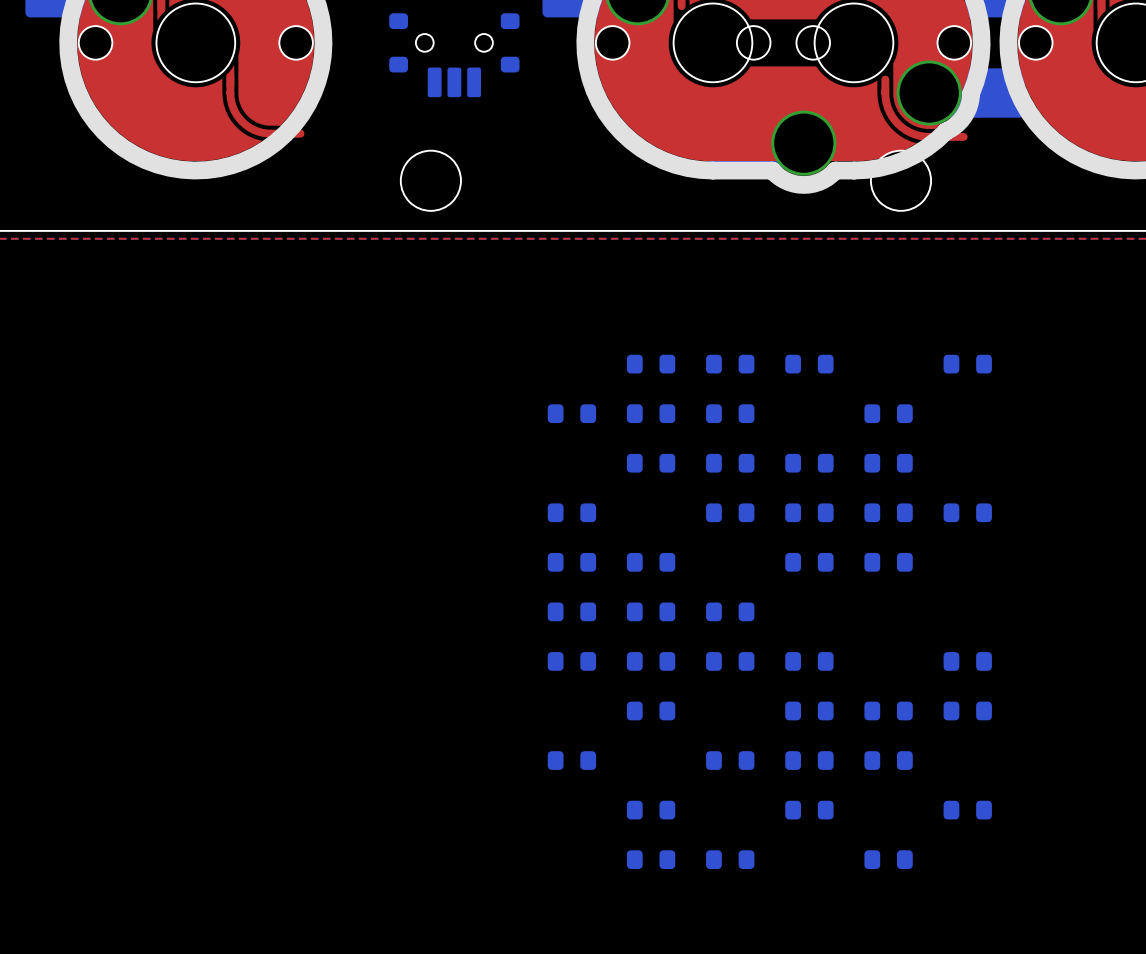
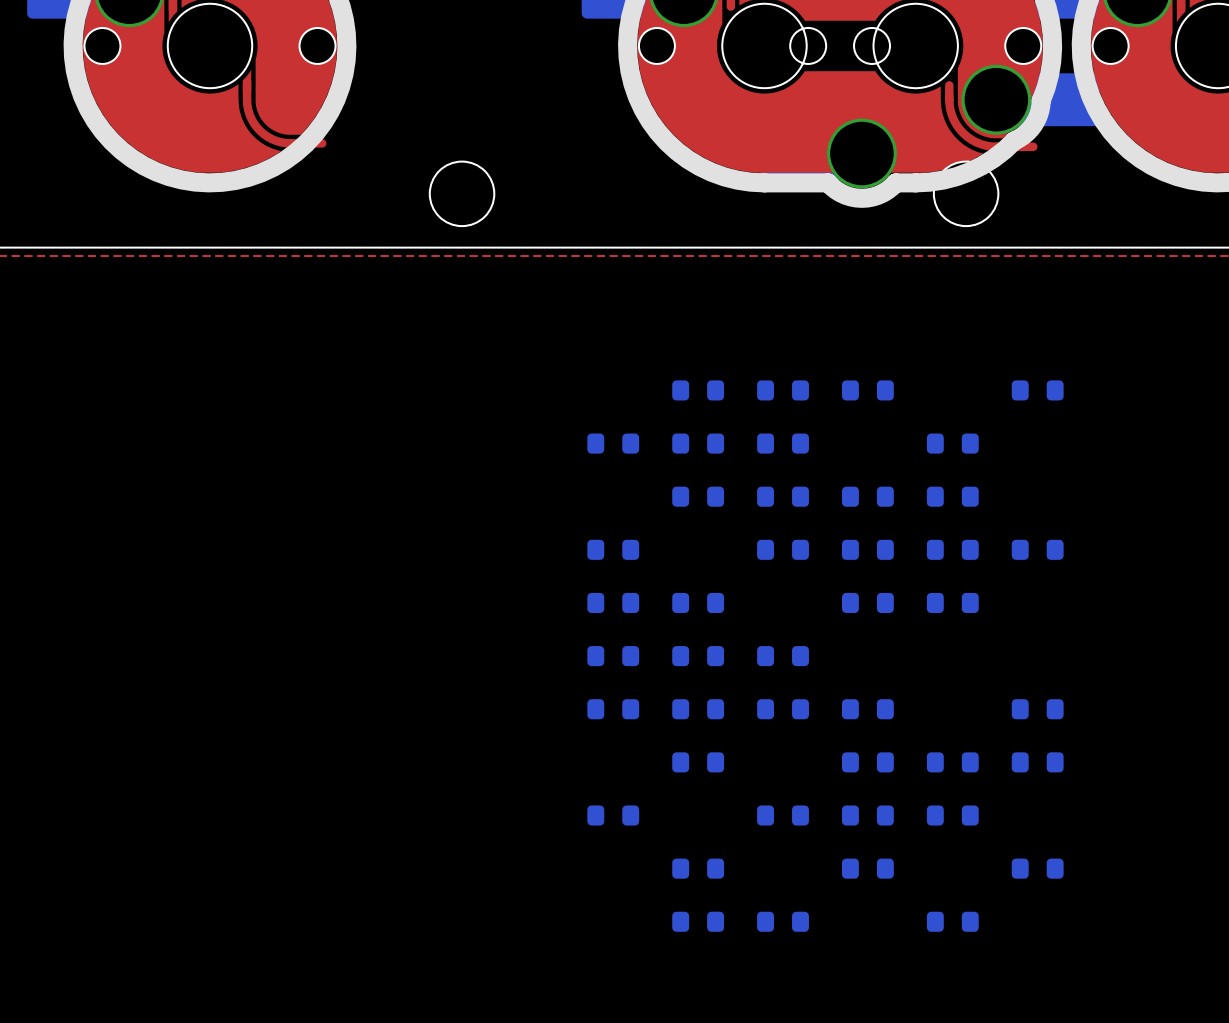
part: (454, 55) -> none

